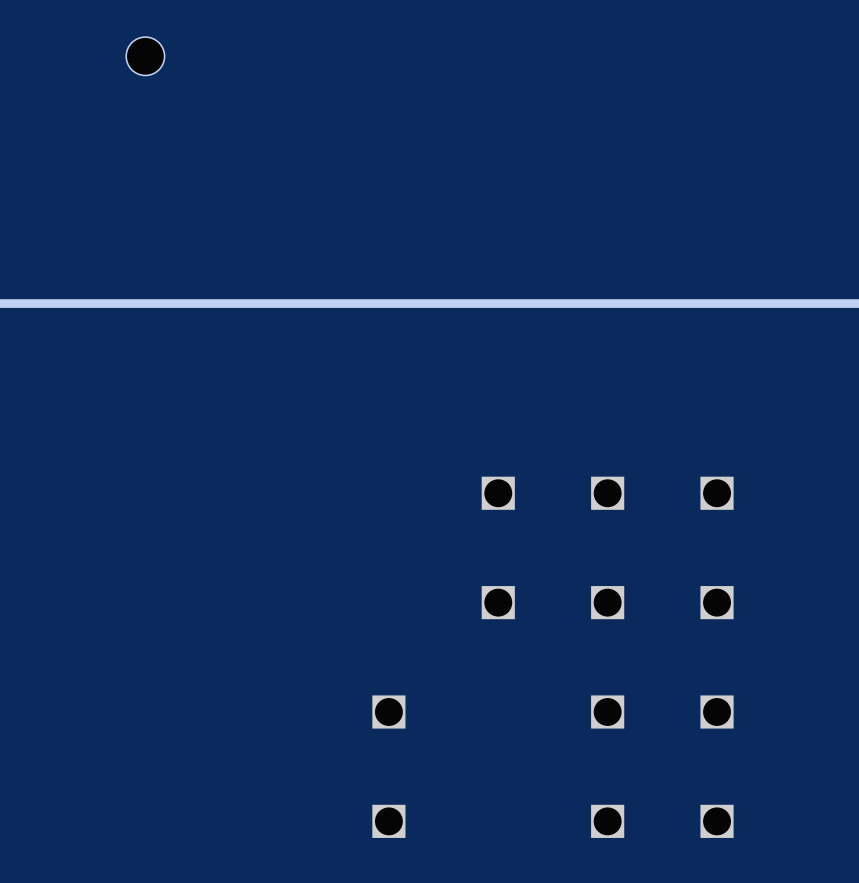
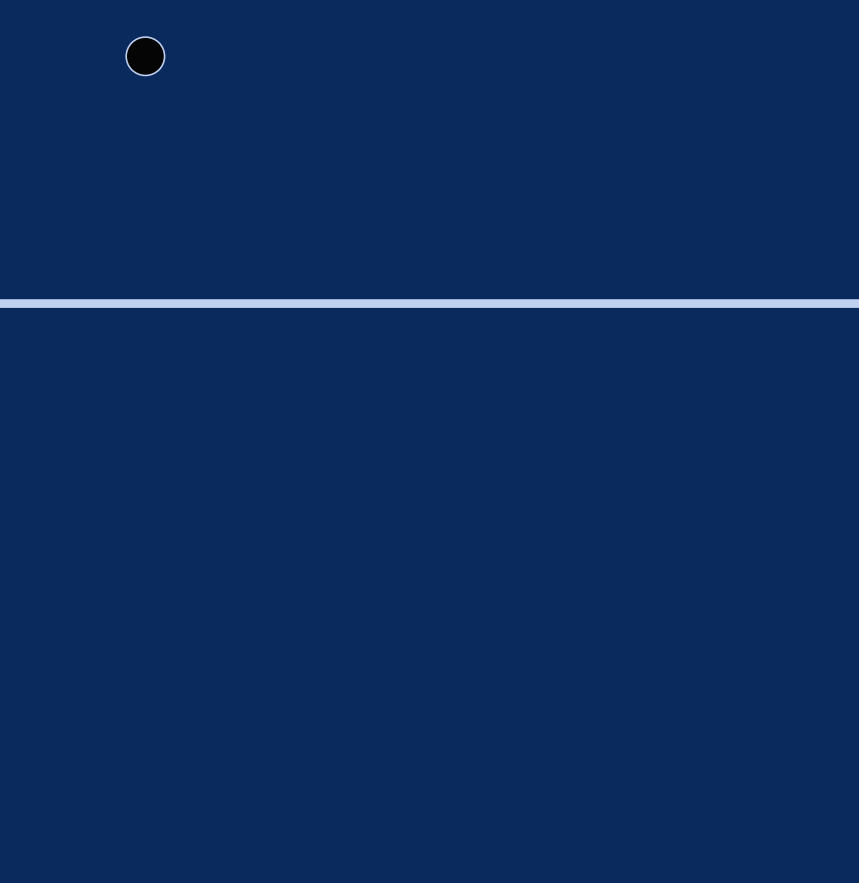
part: (498, 493) -> none
part: (607, 493) -> none
part: (717, 493) -> none
part: (498, 602) -> none
part: (607, 602) -> none
part: (717, 602) -> none
part: (388, 712) -> none
part: (607, 712) -> none
part: (717, 712) -> none
part: (388, 821) -> none
part: (607, 821) -> none
part: (717, 821) -> none

